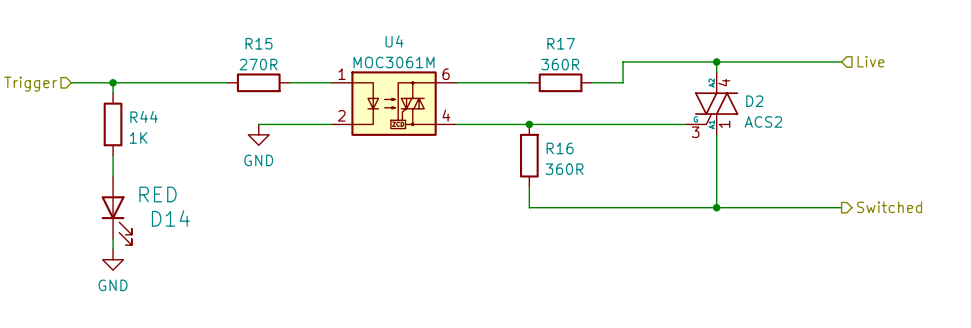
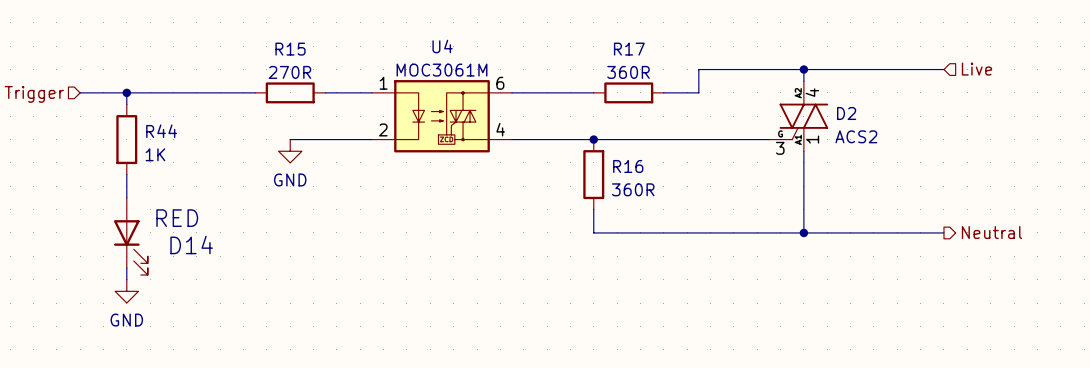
hierarchical label: Switched (889, 207) -> Neutral (991, 232)

